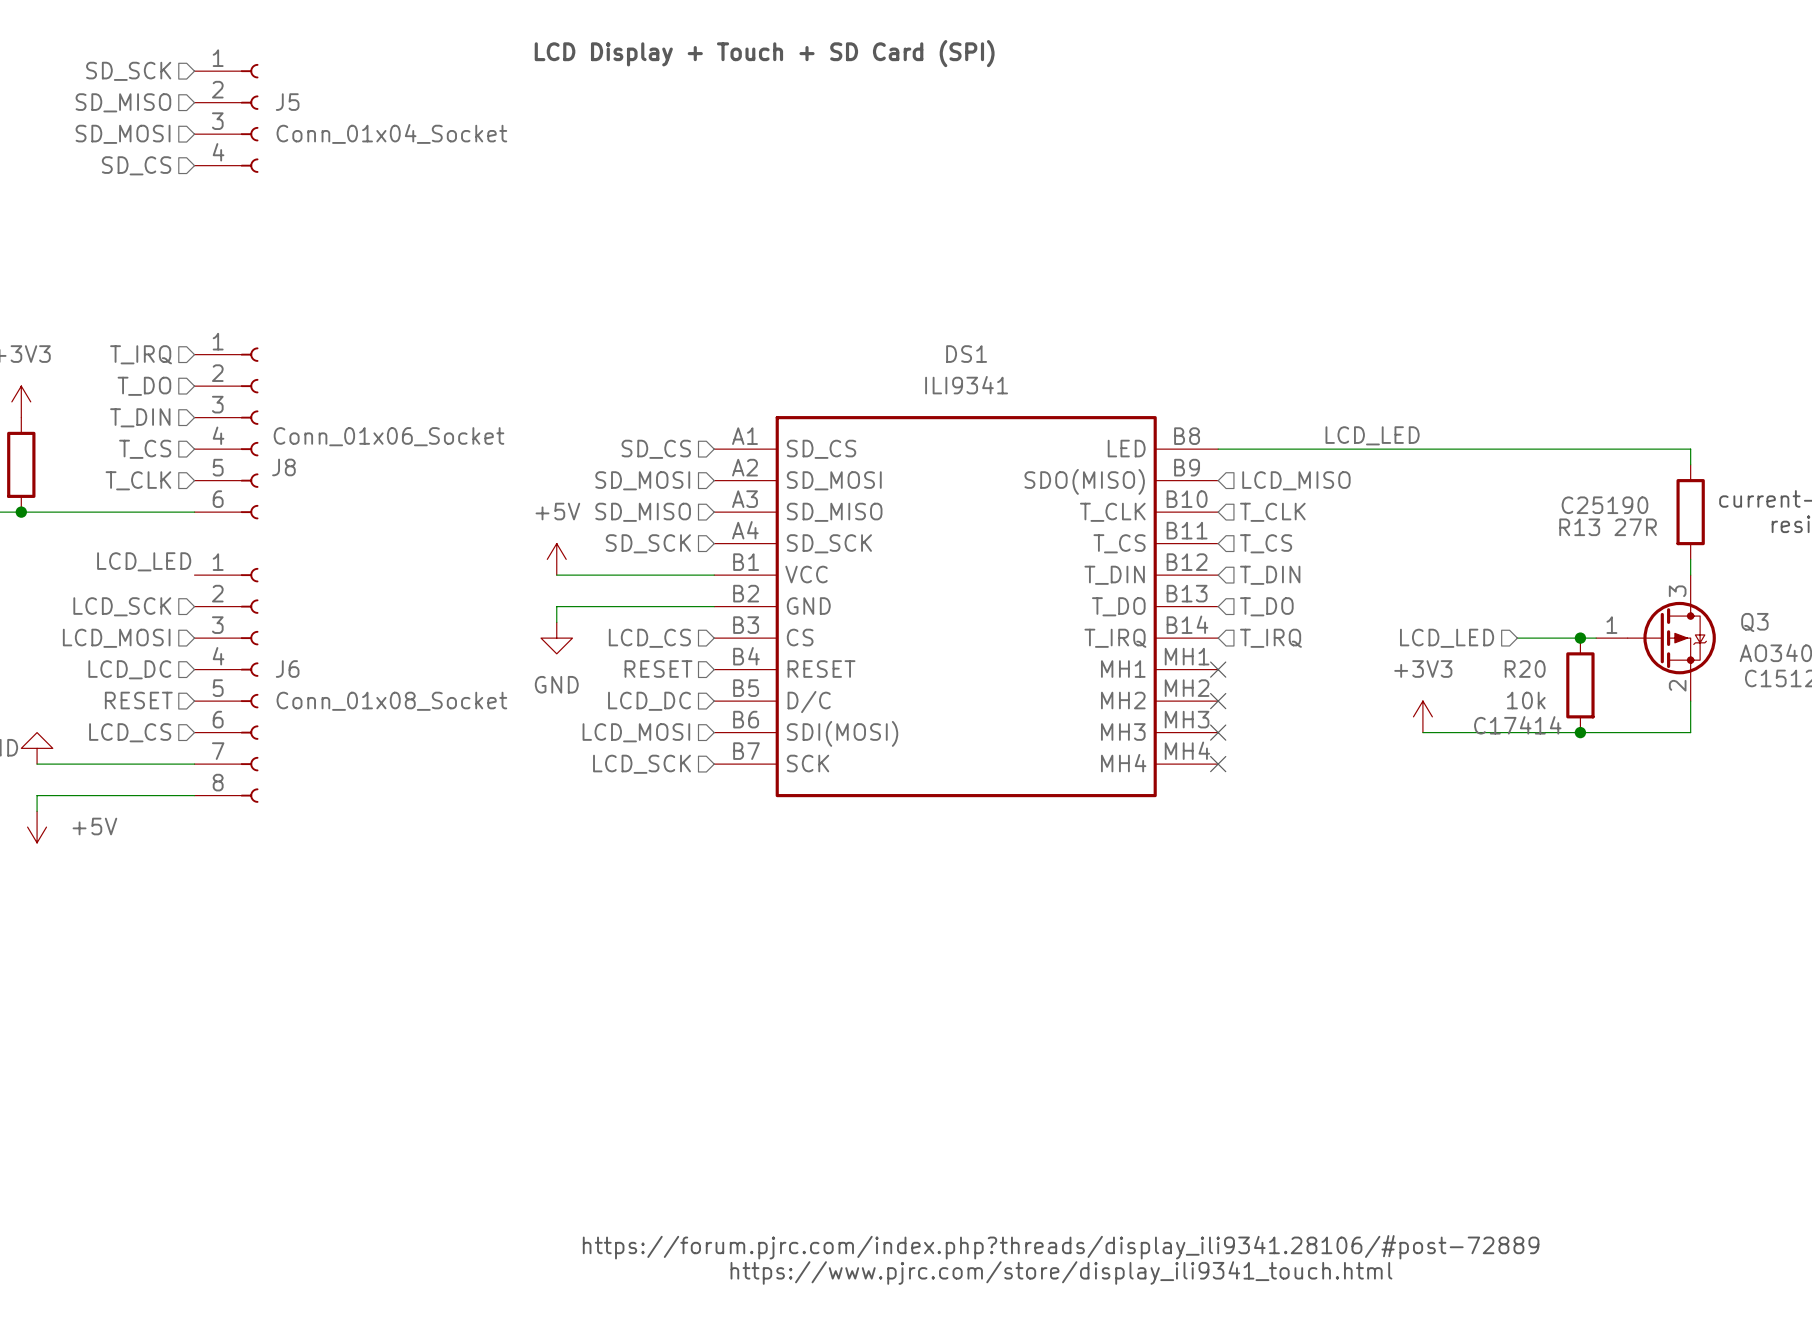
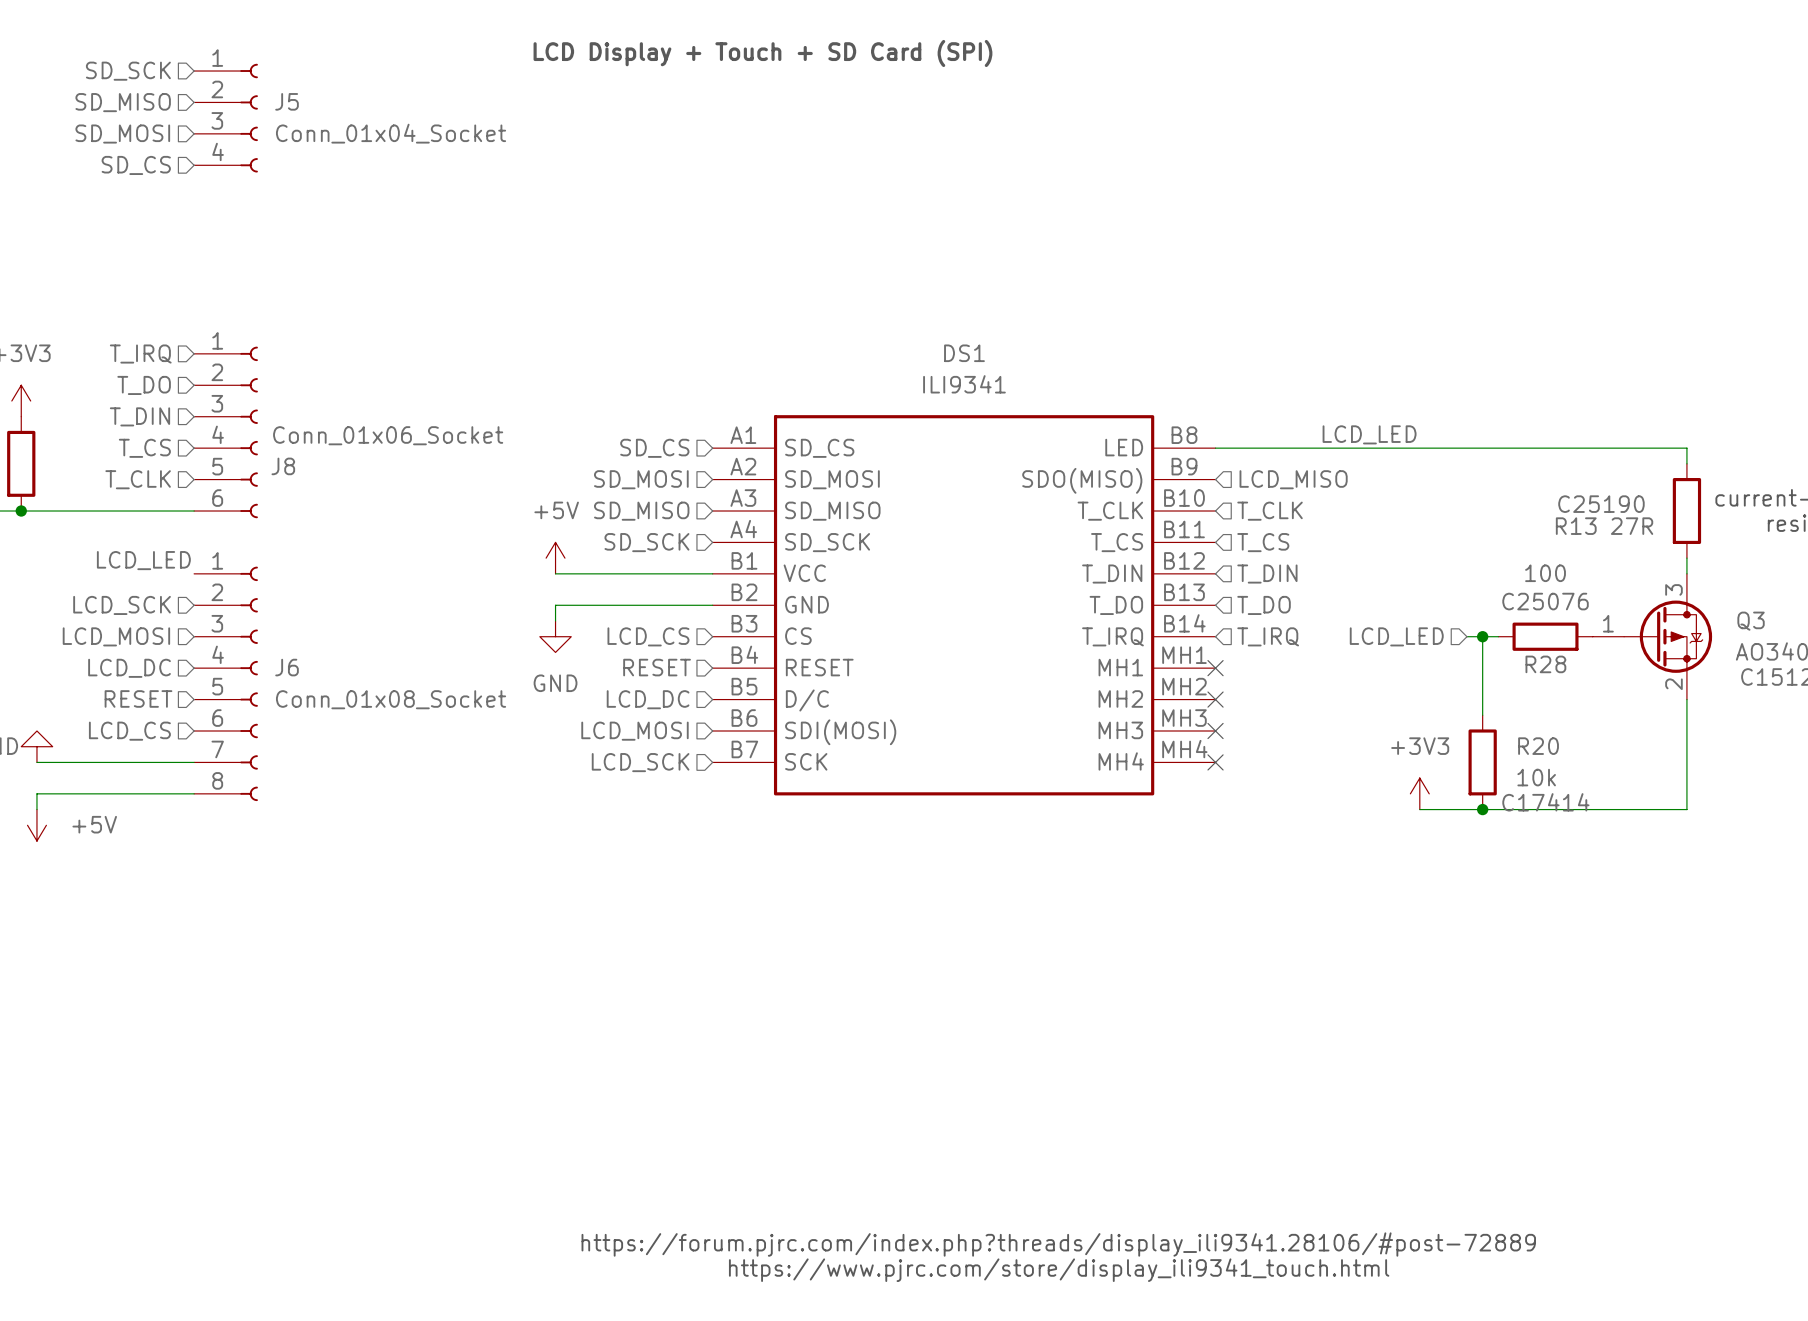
hierarchical label position: LCD_LED (1447, 638) -> LCD_LED (1396, 636)
wire: none -> (1466, 636) (1498, 636)
wire: none -> (1482, 636) (1482, 715)
junction: none -> (1482, 636)
wire: (1517, 638) (1596, 638) -> none
R28: none -> 100 (1545, 636)
junction: (1580, 638) -> none
R20 name position: R20 (1525, 669) -> R20 (1538, 746)
R20 position: (1580, 685) -> (1482, 762)
R20 value position: 10k (1526, 700) -> 10k (1536, 777)
power symbol position: +3V3 (1422, 716) -> +3V3 (1419, 793)
R20 text position: C17414 (1517, 725) -> C17414 (1545, 802)
wire: (1422, 732) (1690, 732) -> (1419, 809) (1686, 809) (1686, 731)
junction: (1580, 732) -> none
junction: none -> (1482, 809)

